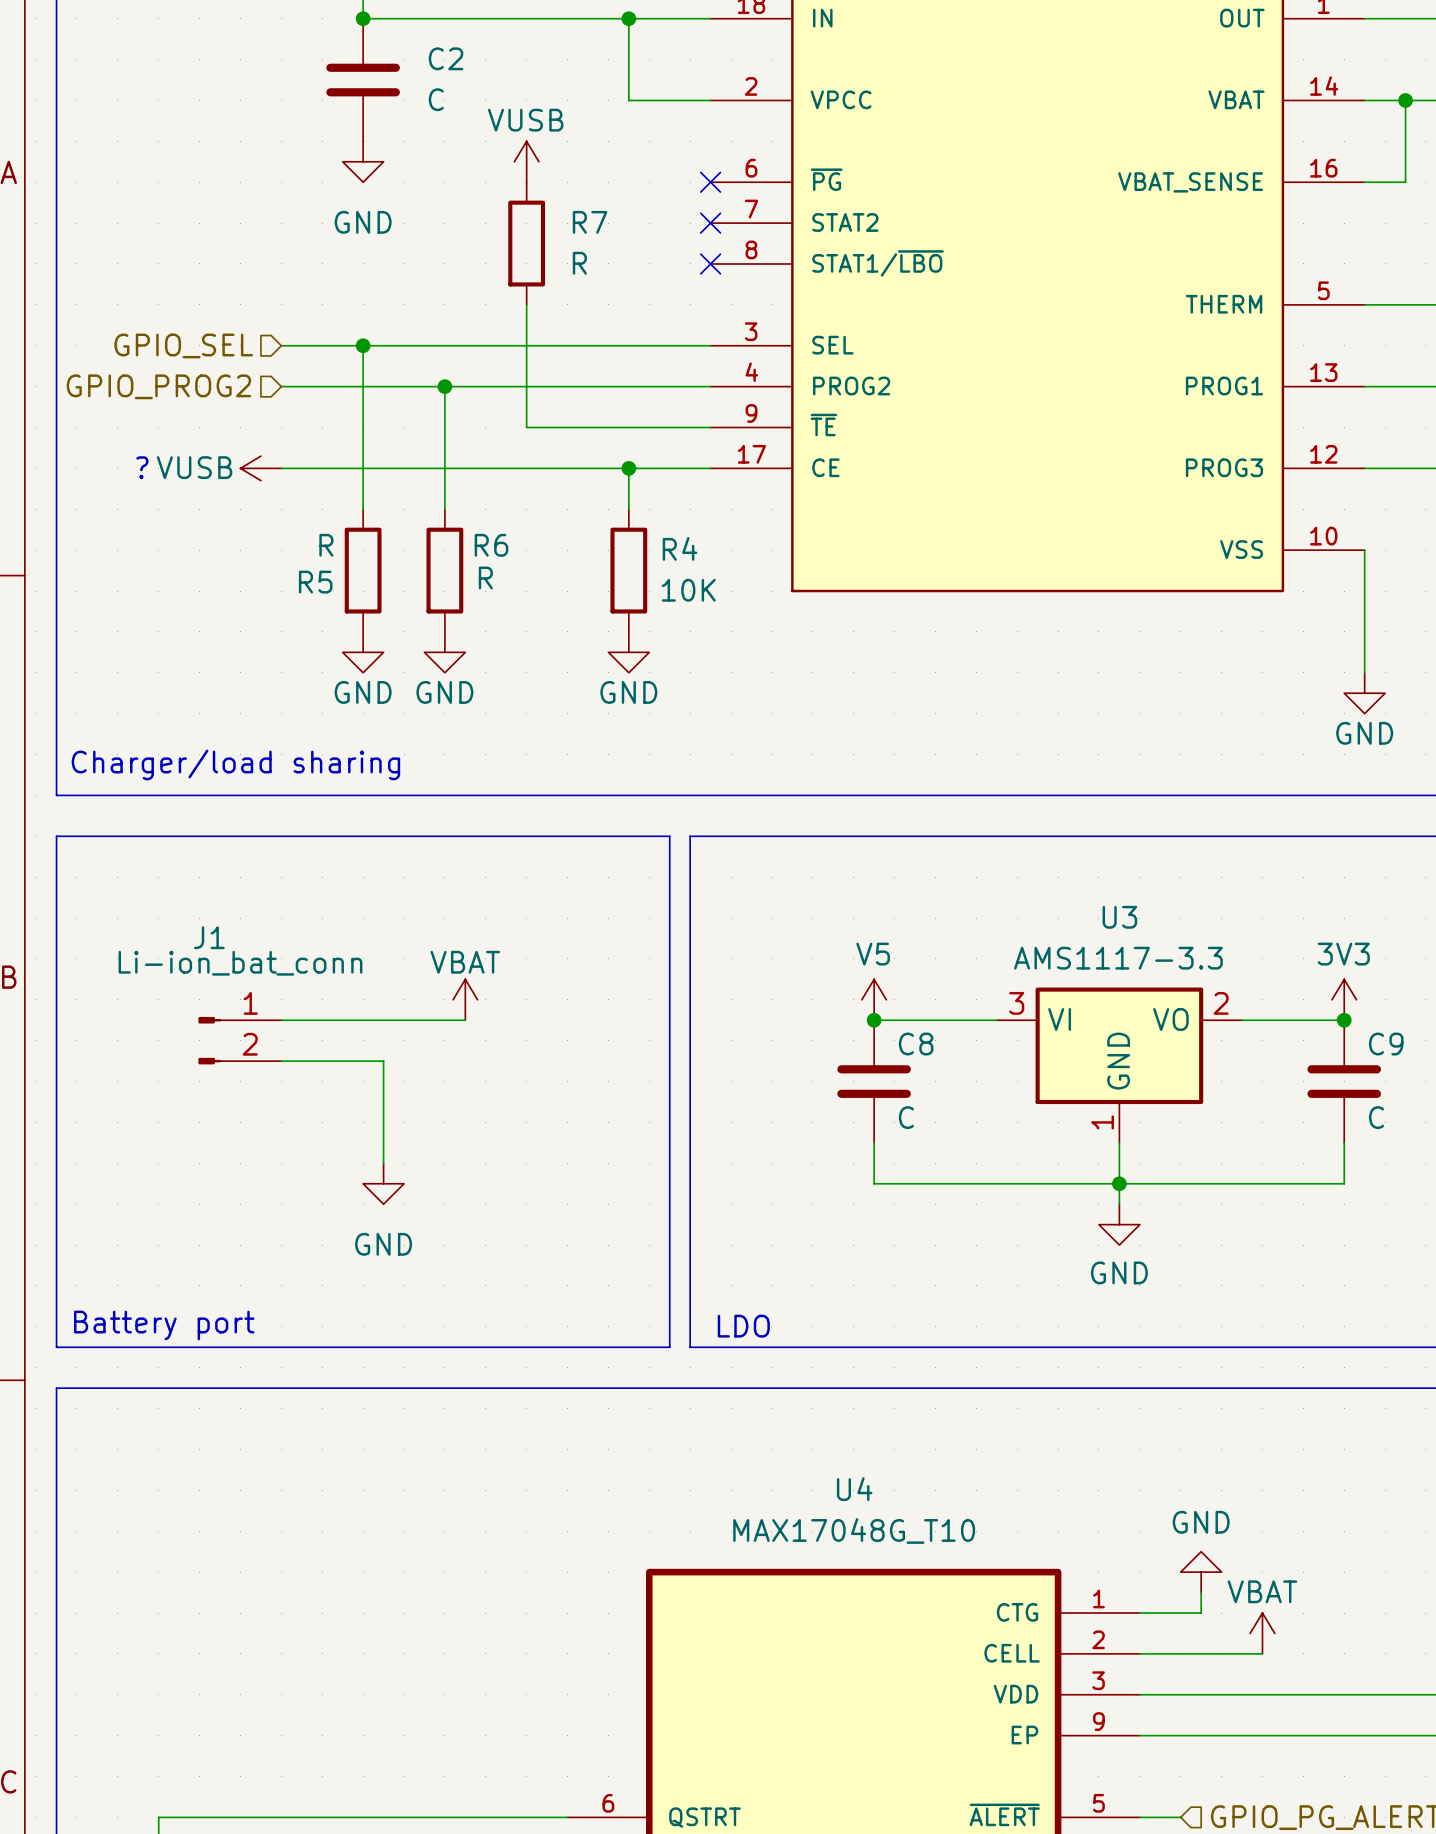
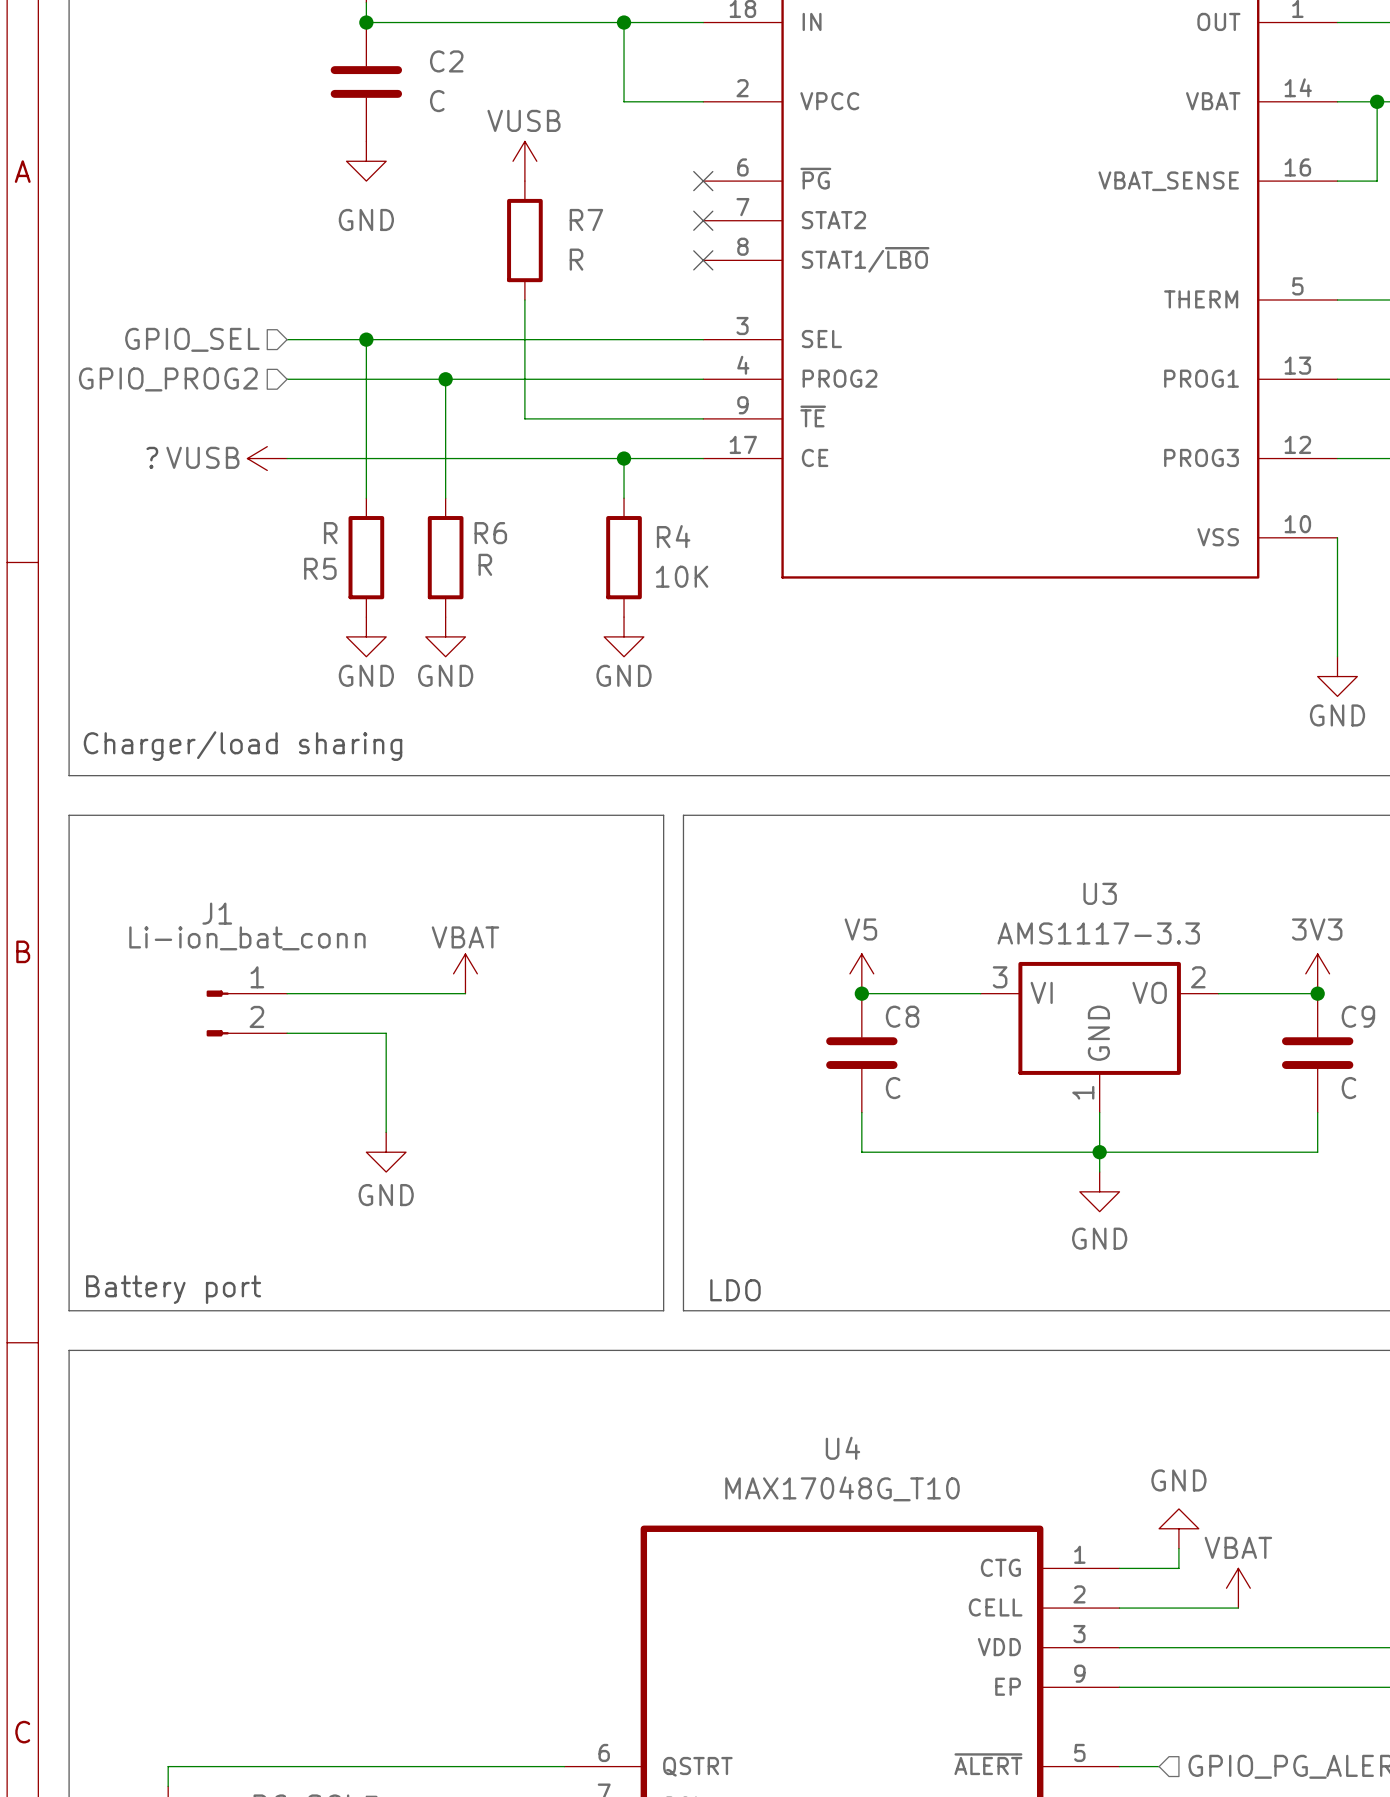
power symbol text position: GND (383, 1244) -> GND (386, 1195)

